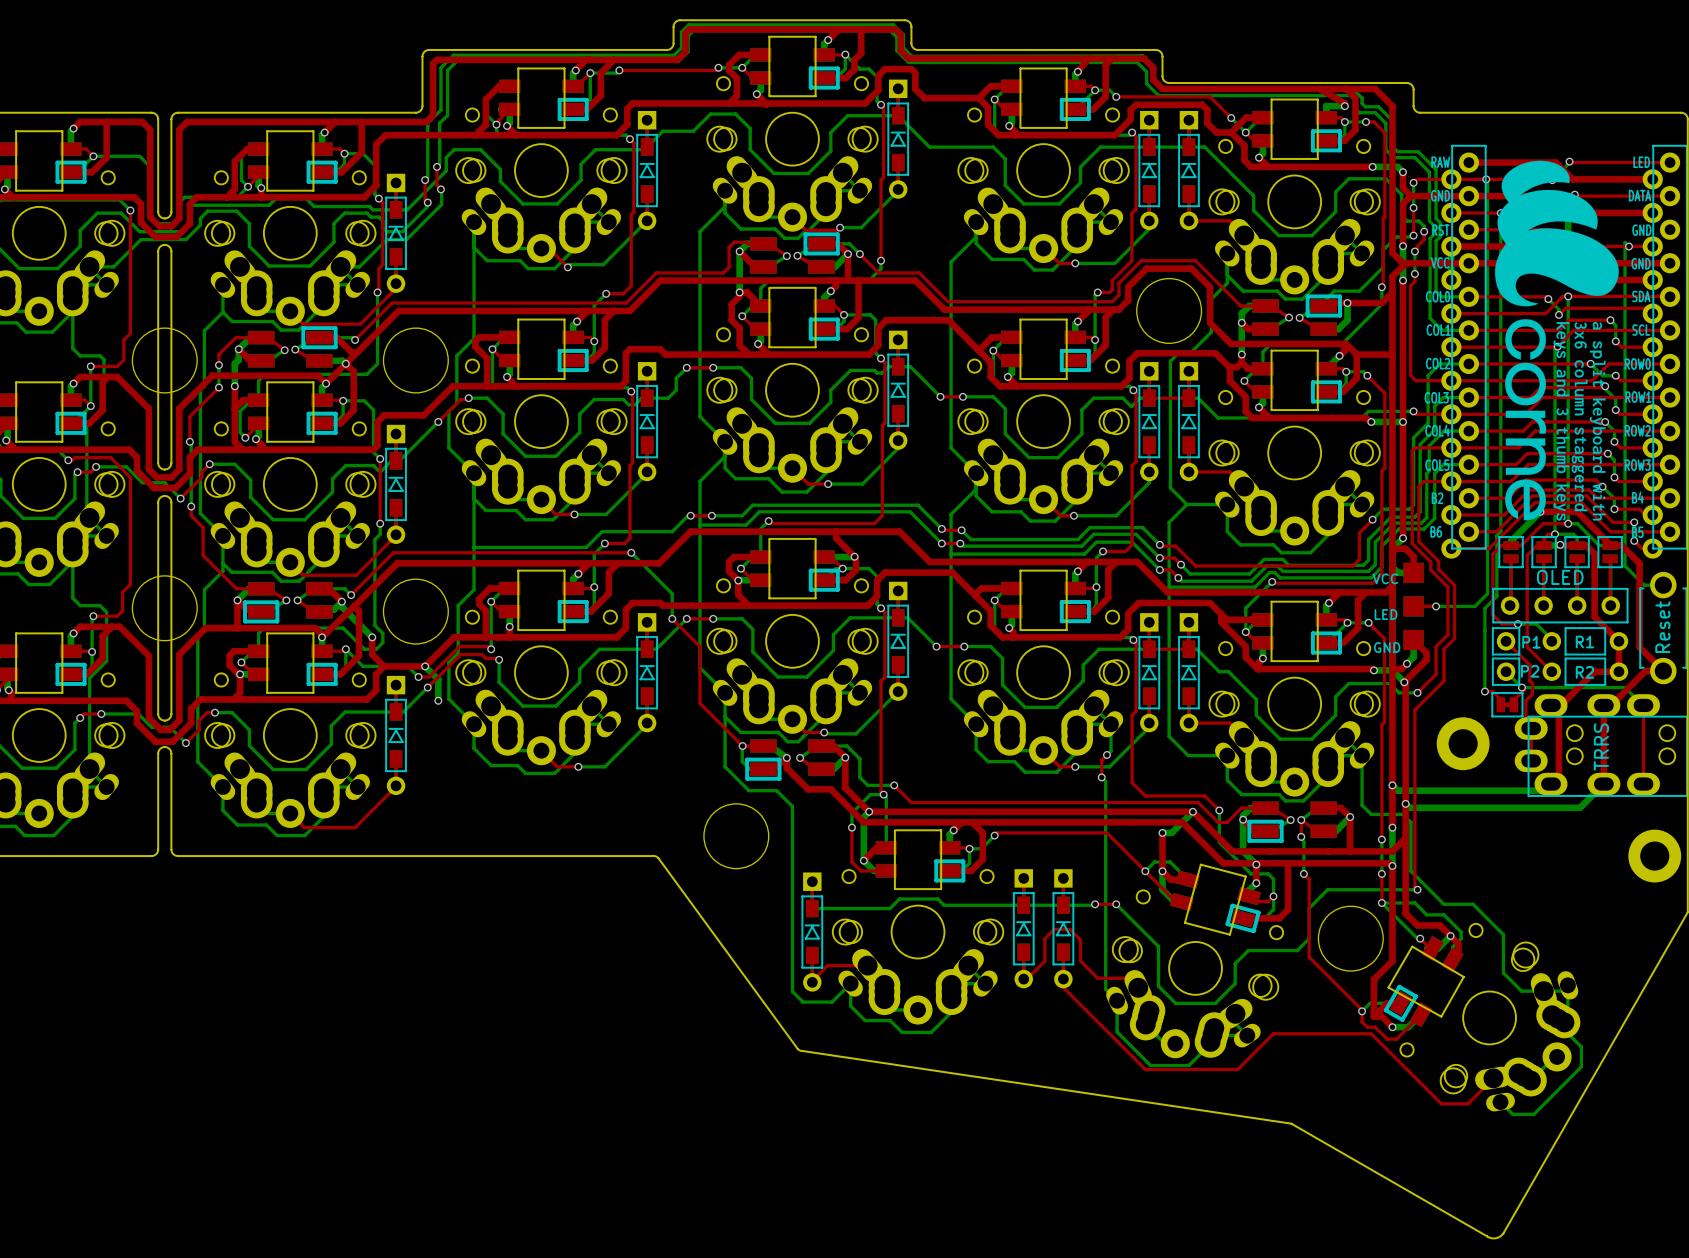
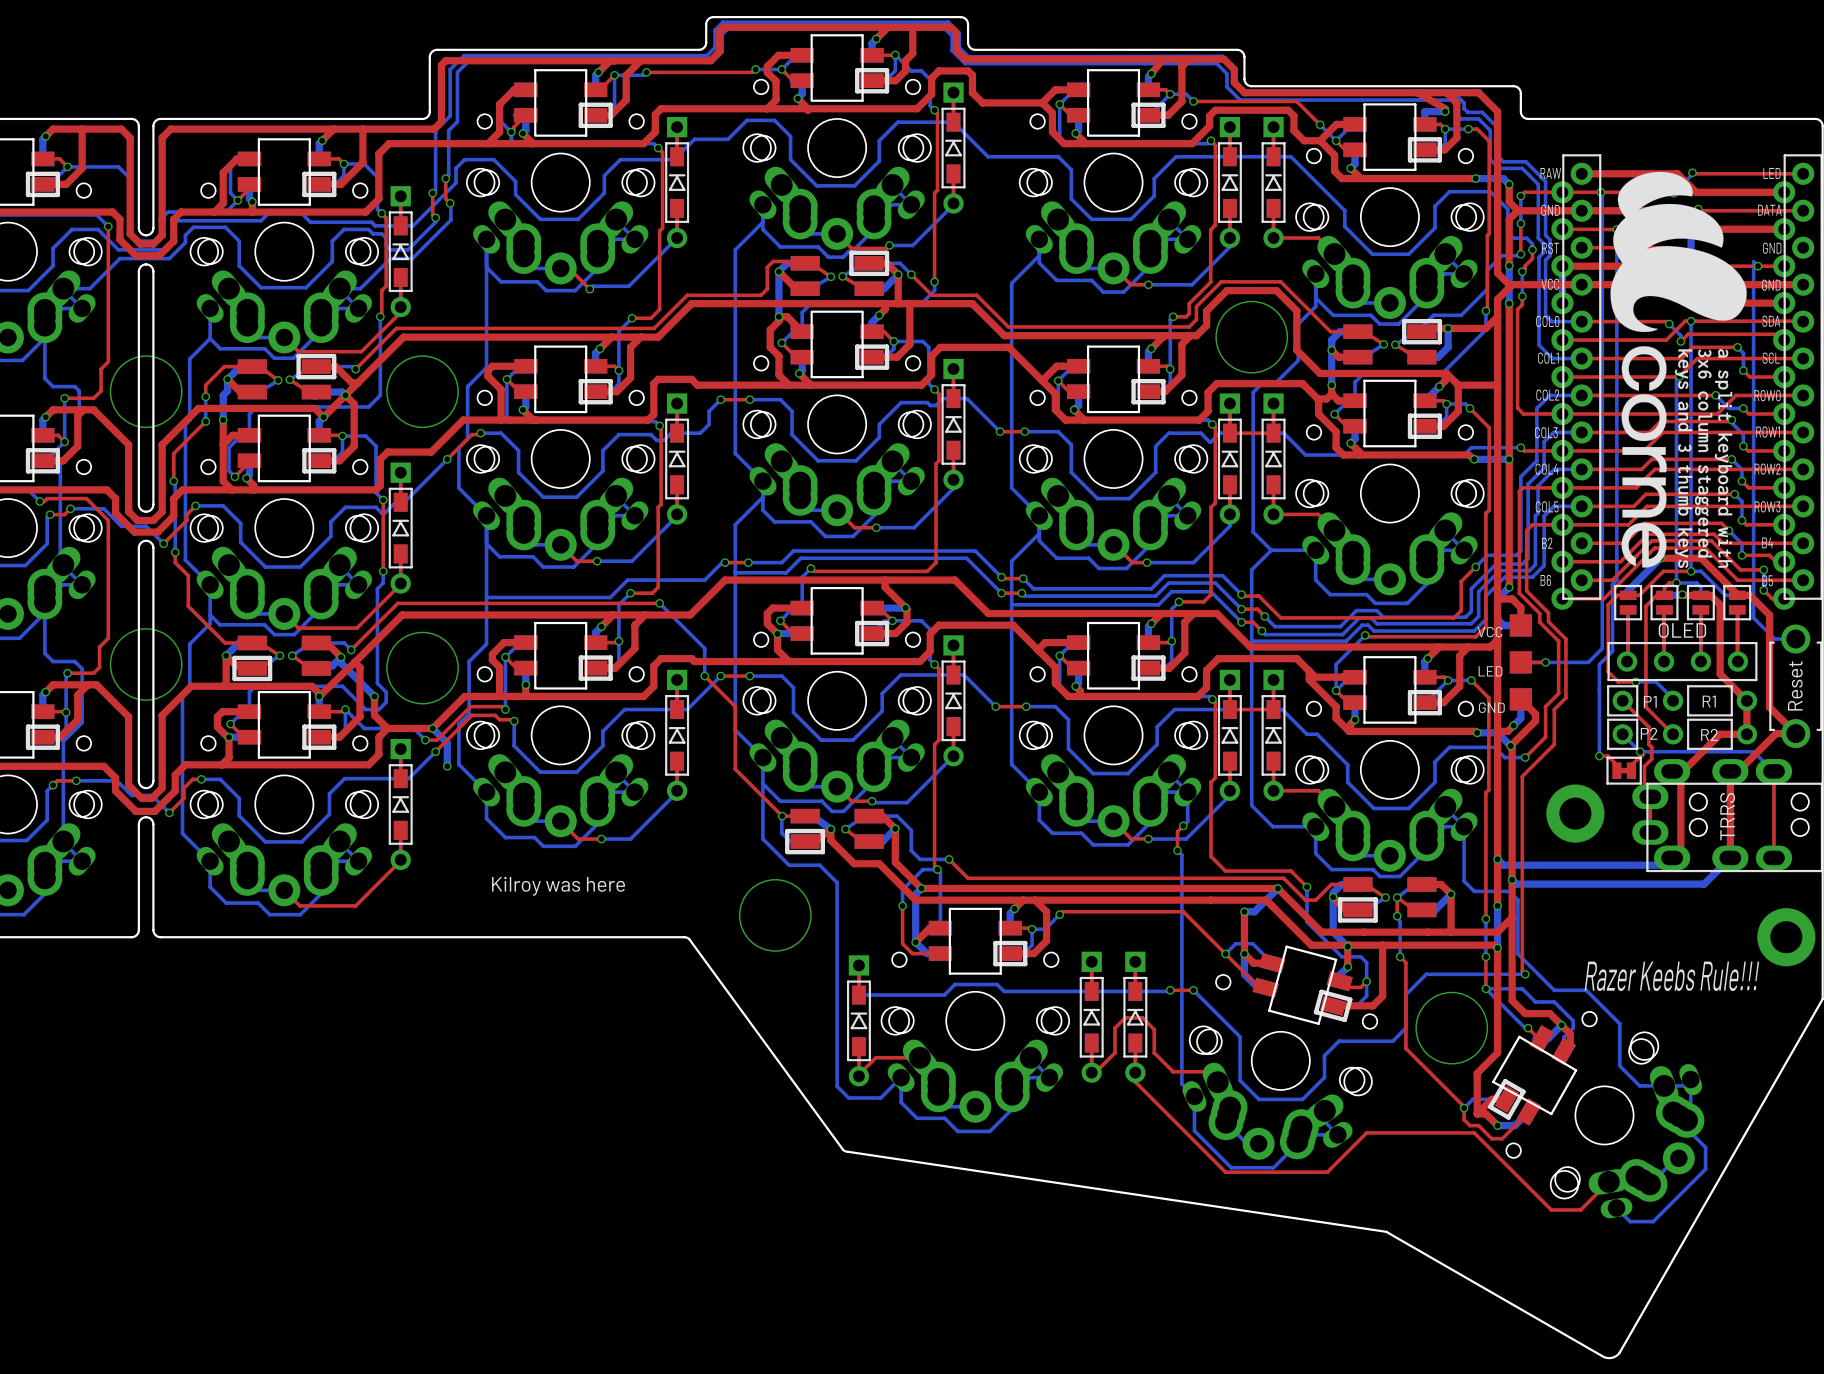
text: none -> Kilroy was here (558, 886)
text: none -> Razer Keebs Rule!!! (1671, 976)

